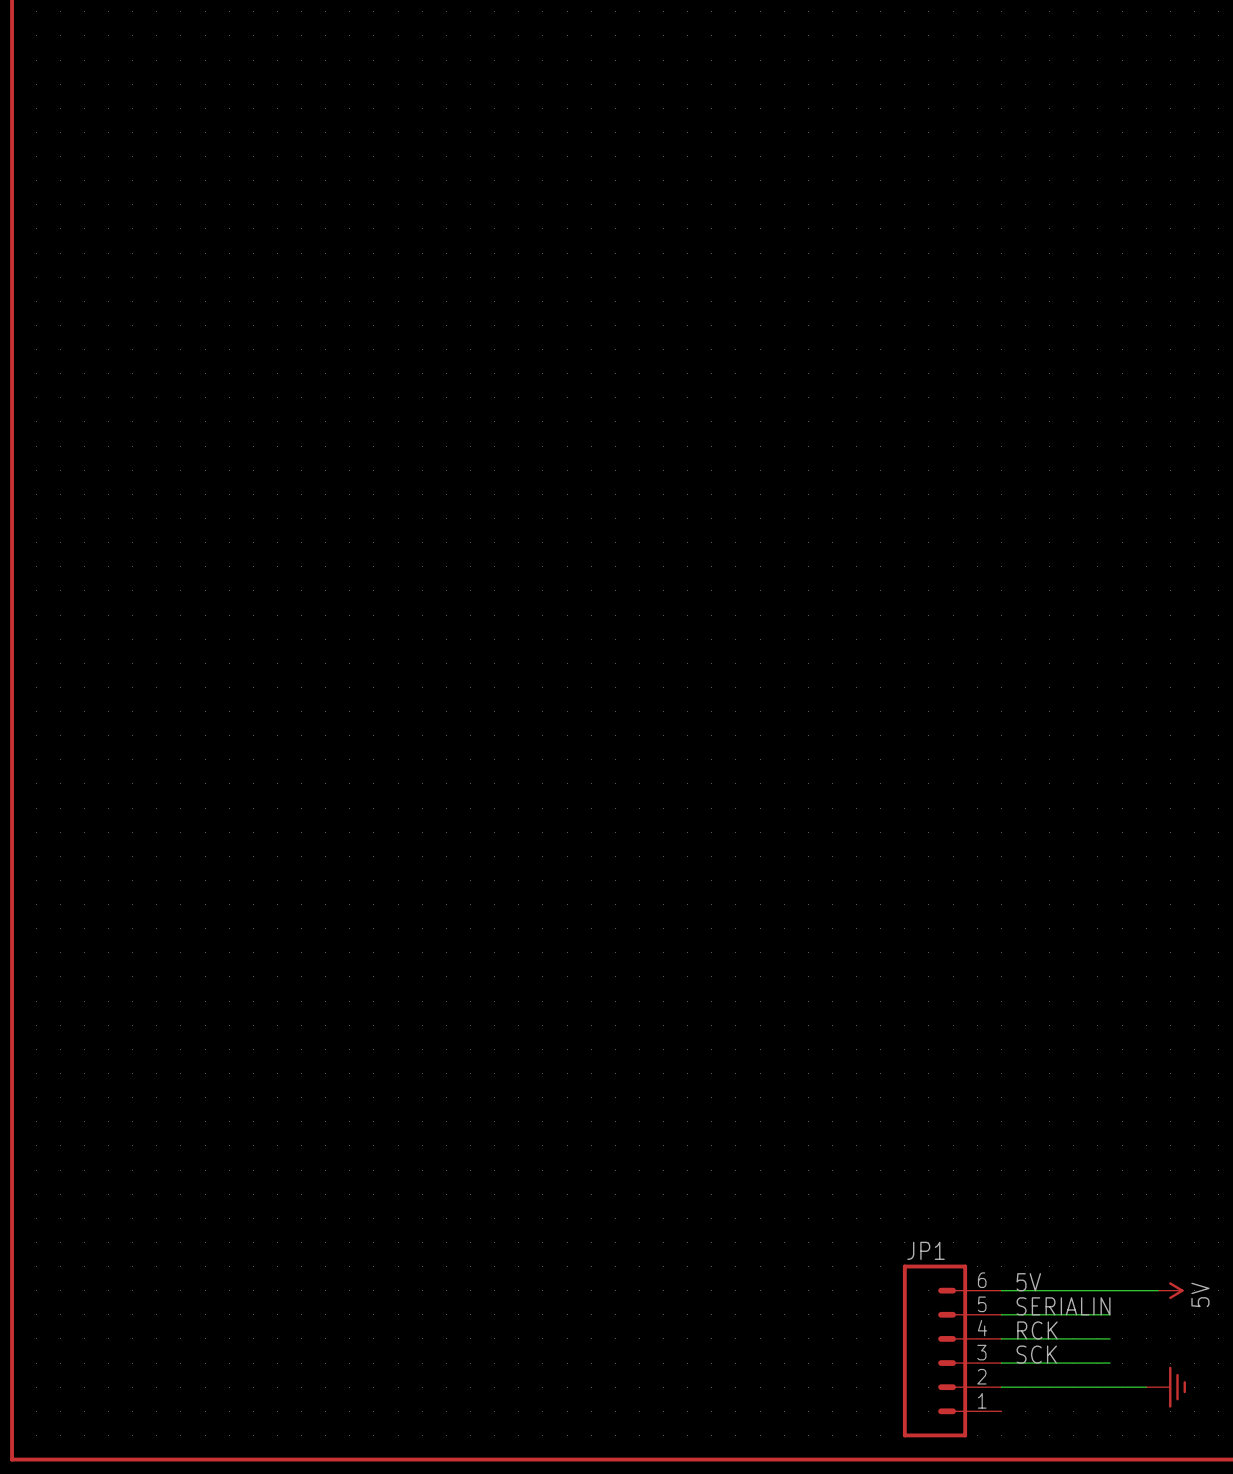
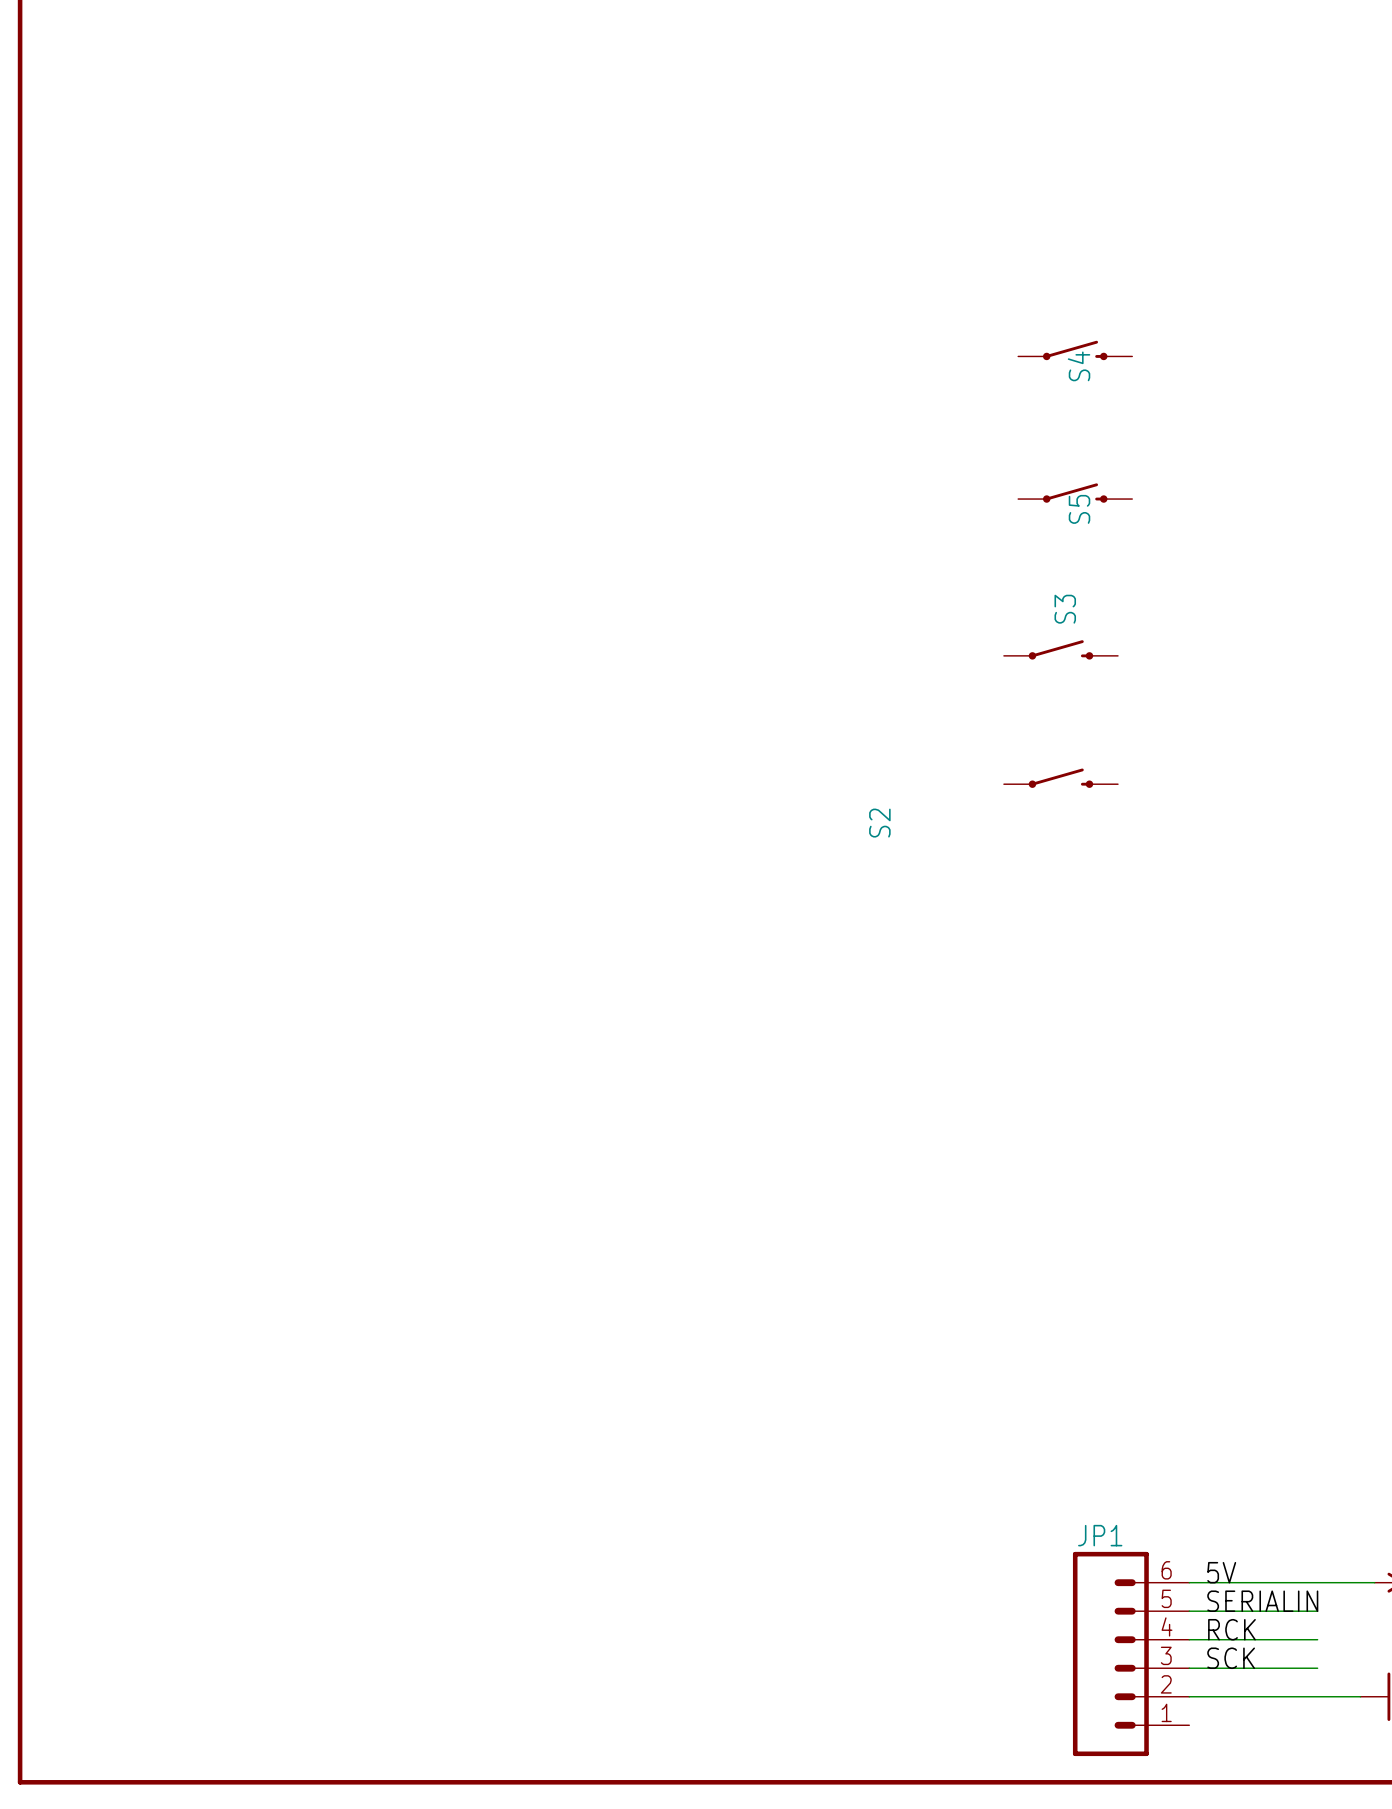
S4: none -> (1075, 350)
S5: none -> (1075, 493)
S3: none -> (1060, 649)
S2: none -> (1060, 778)

